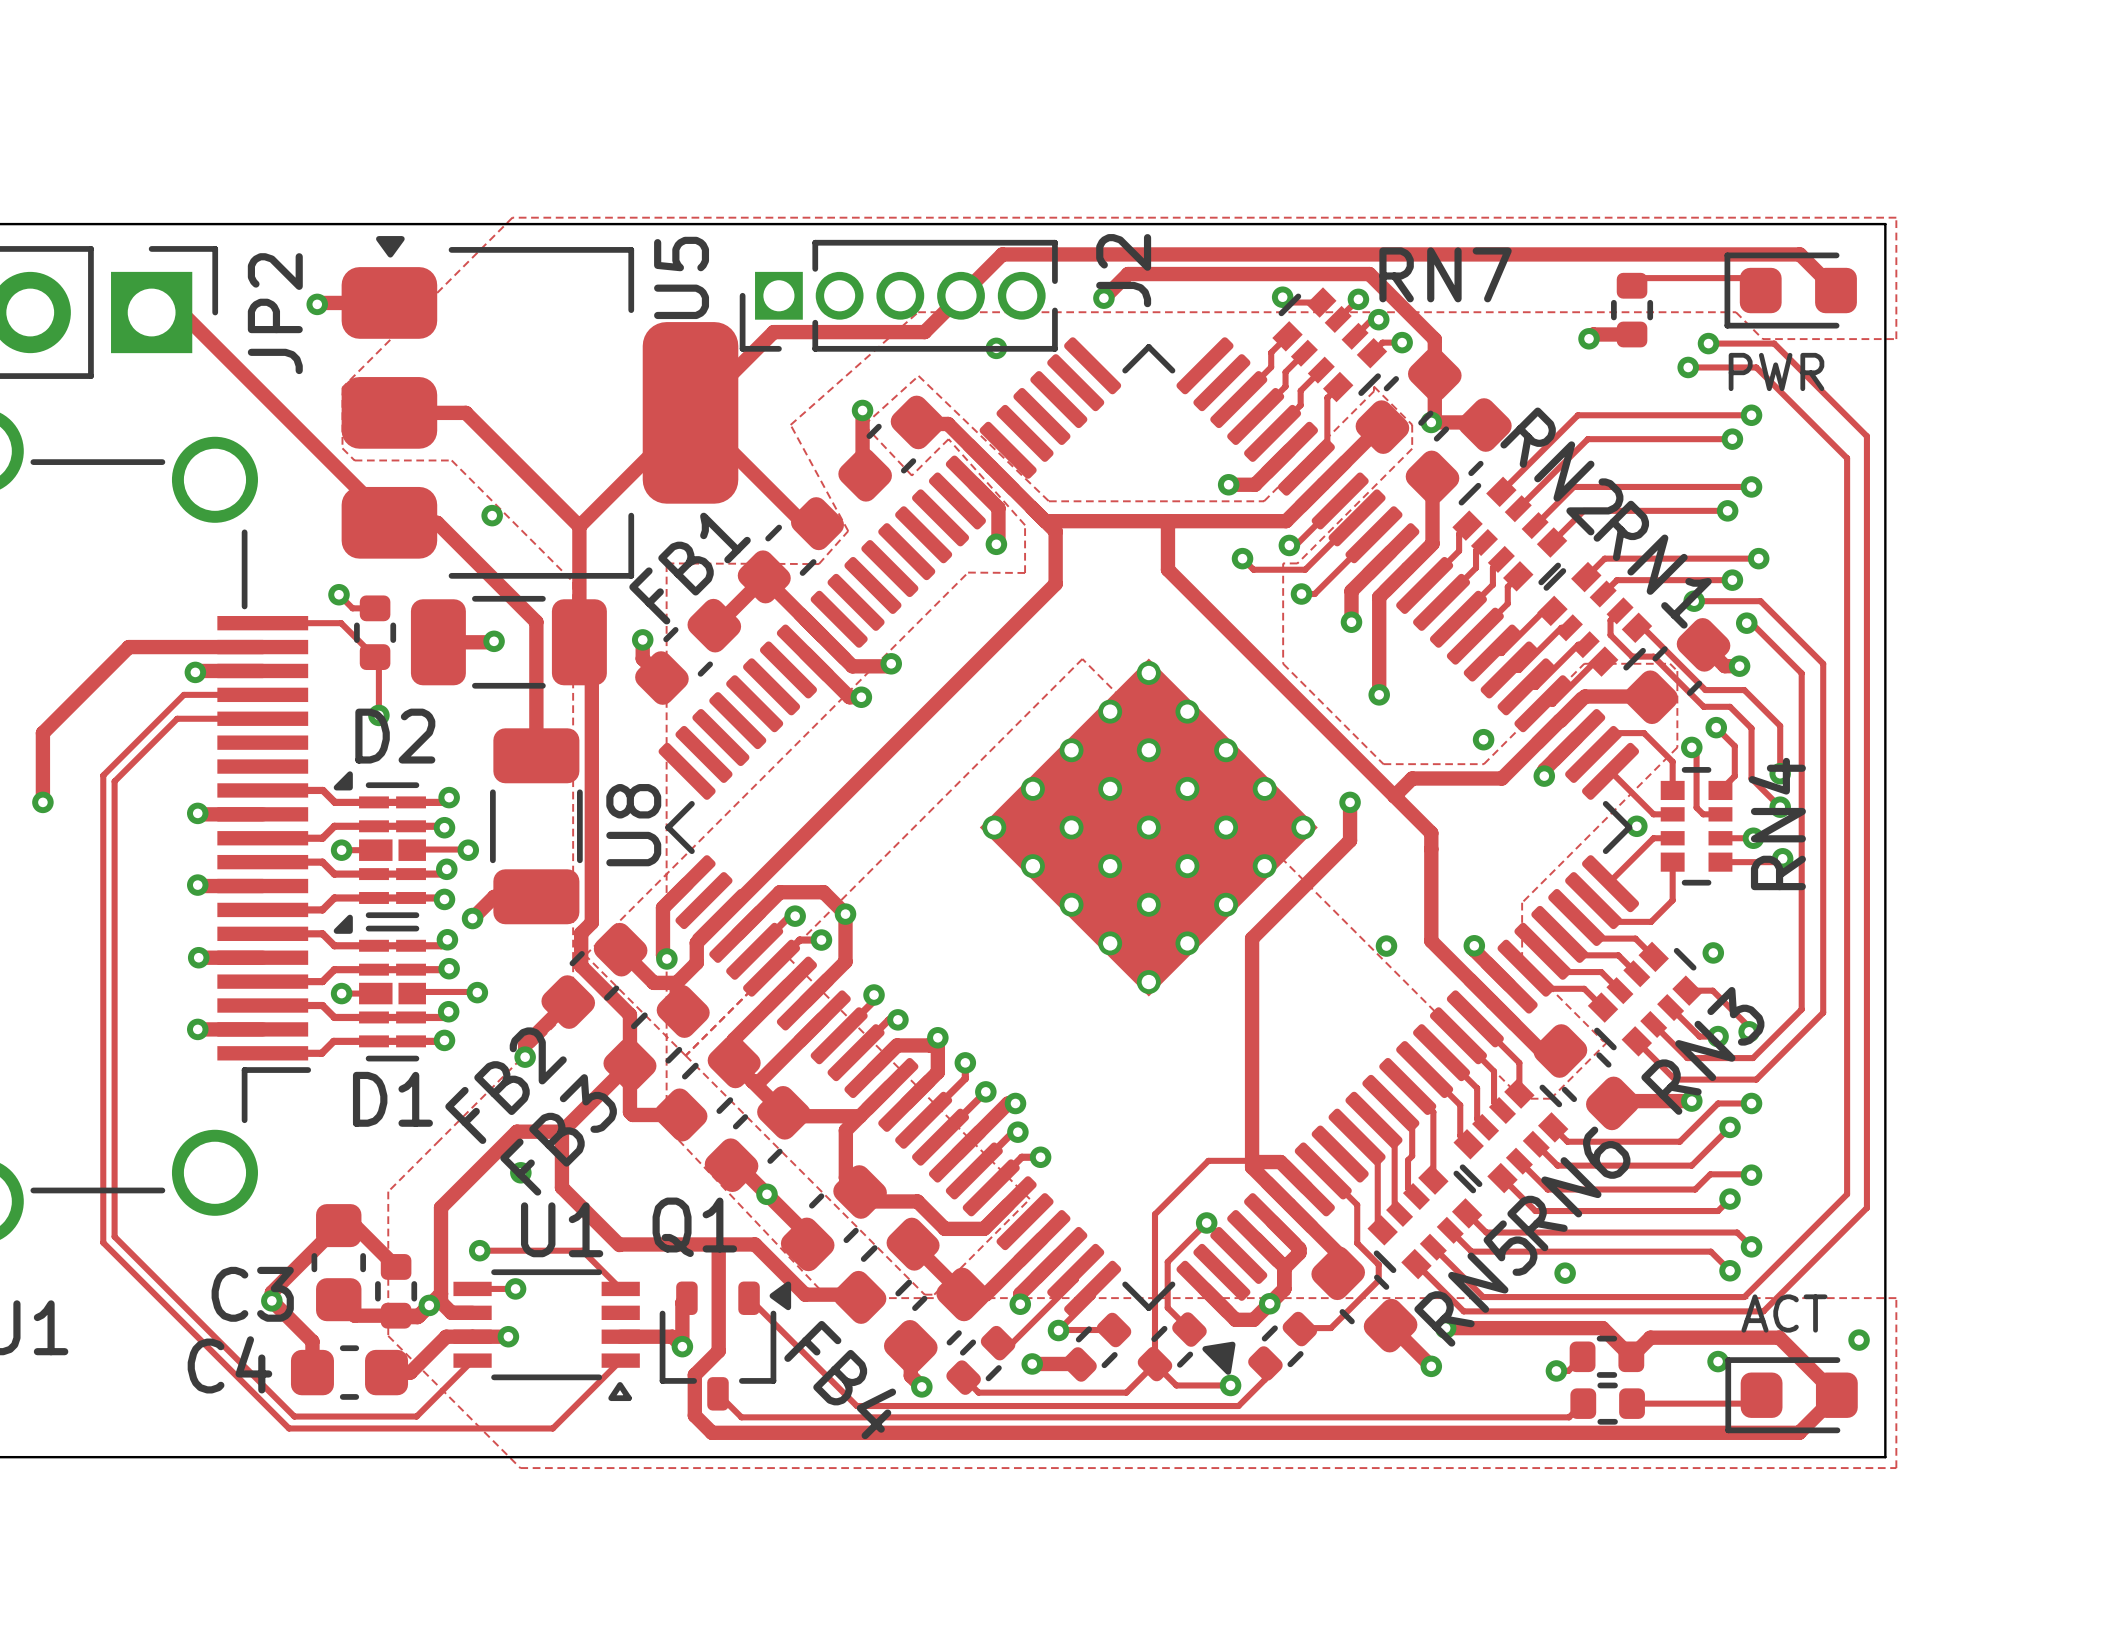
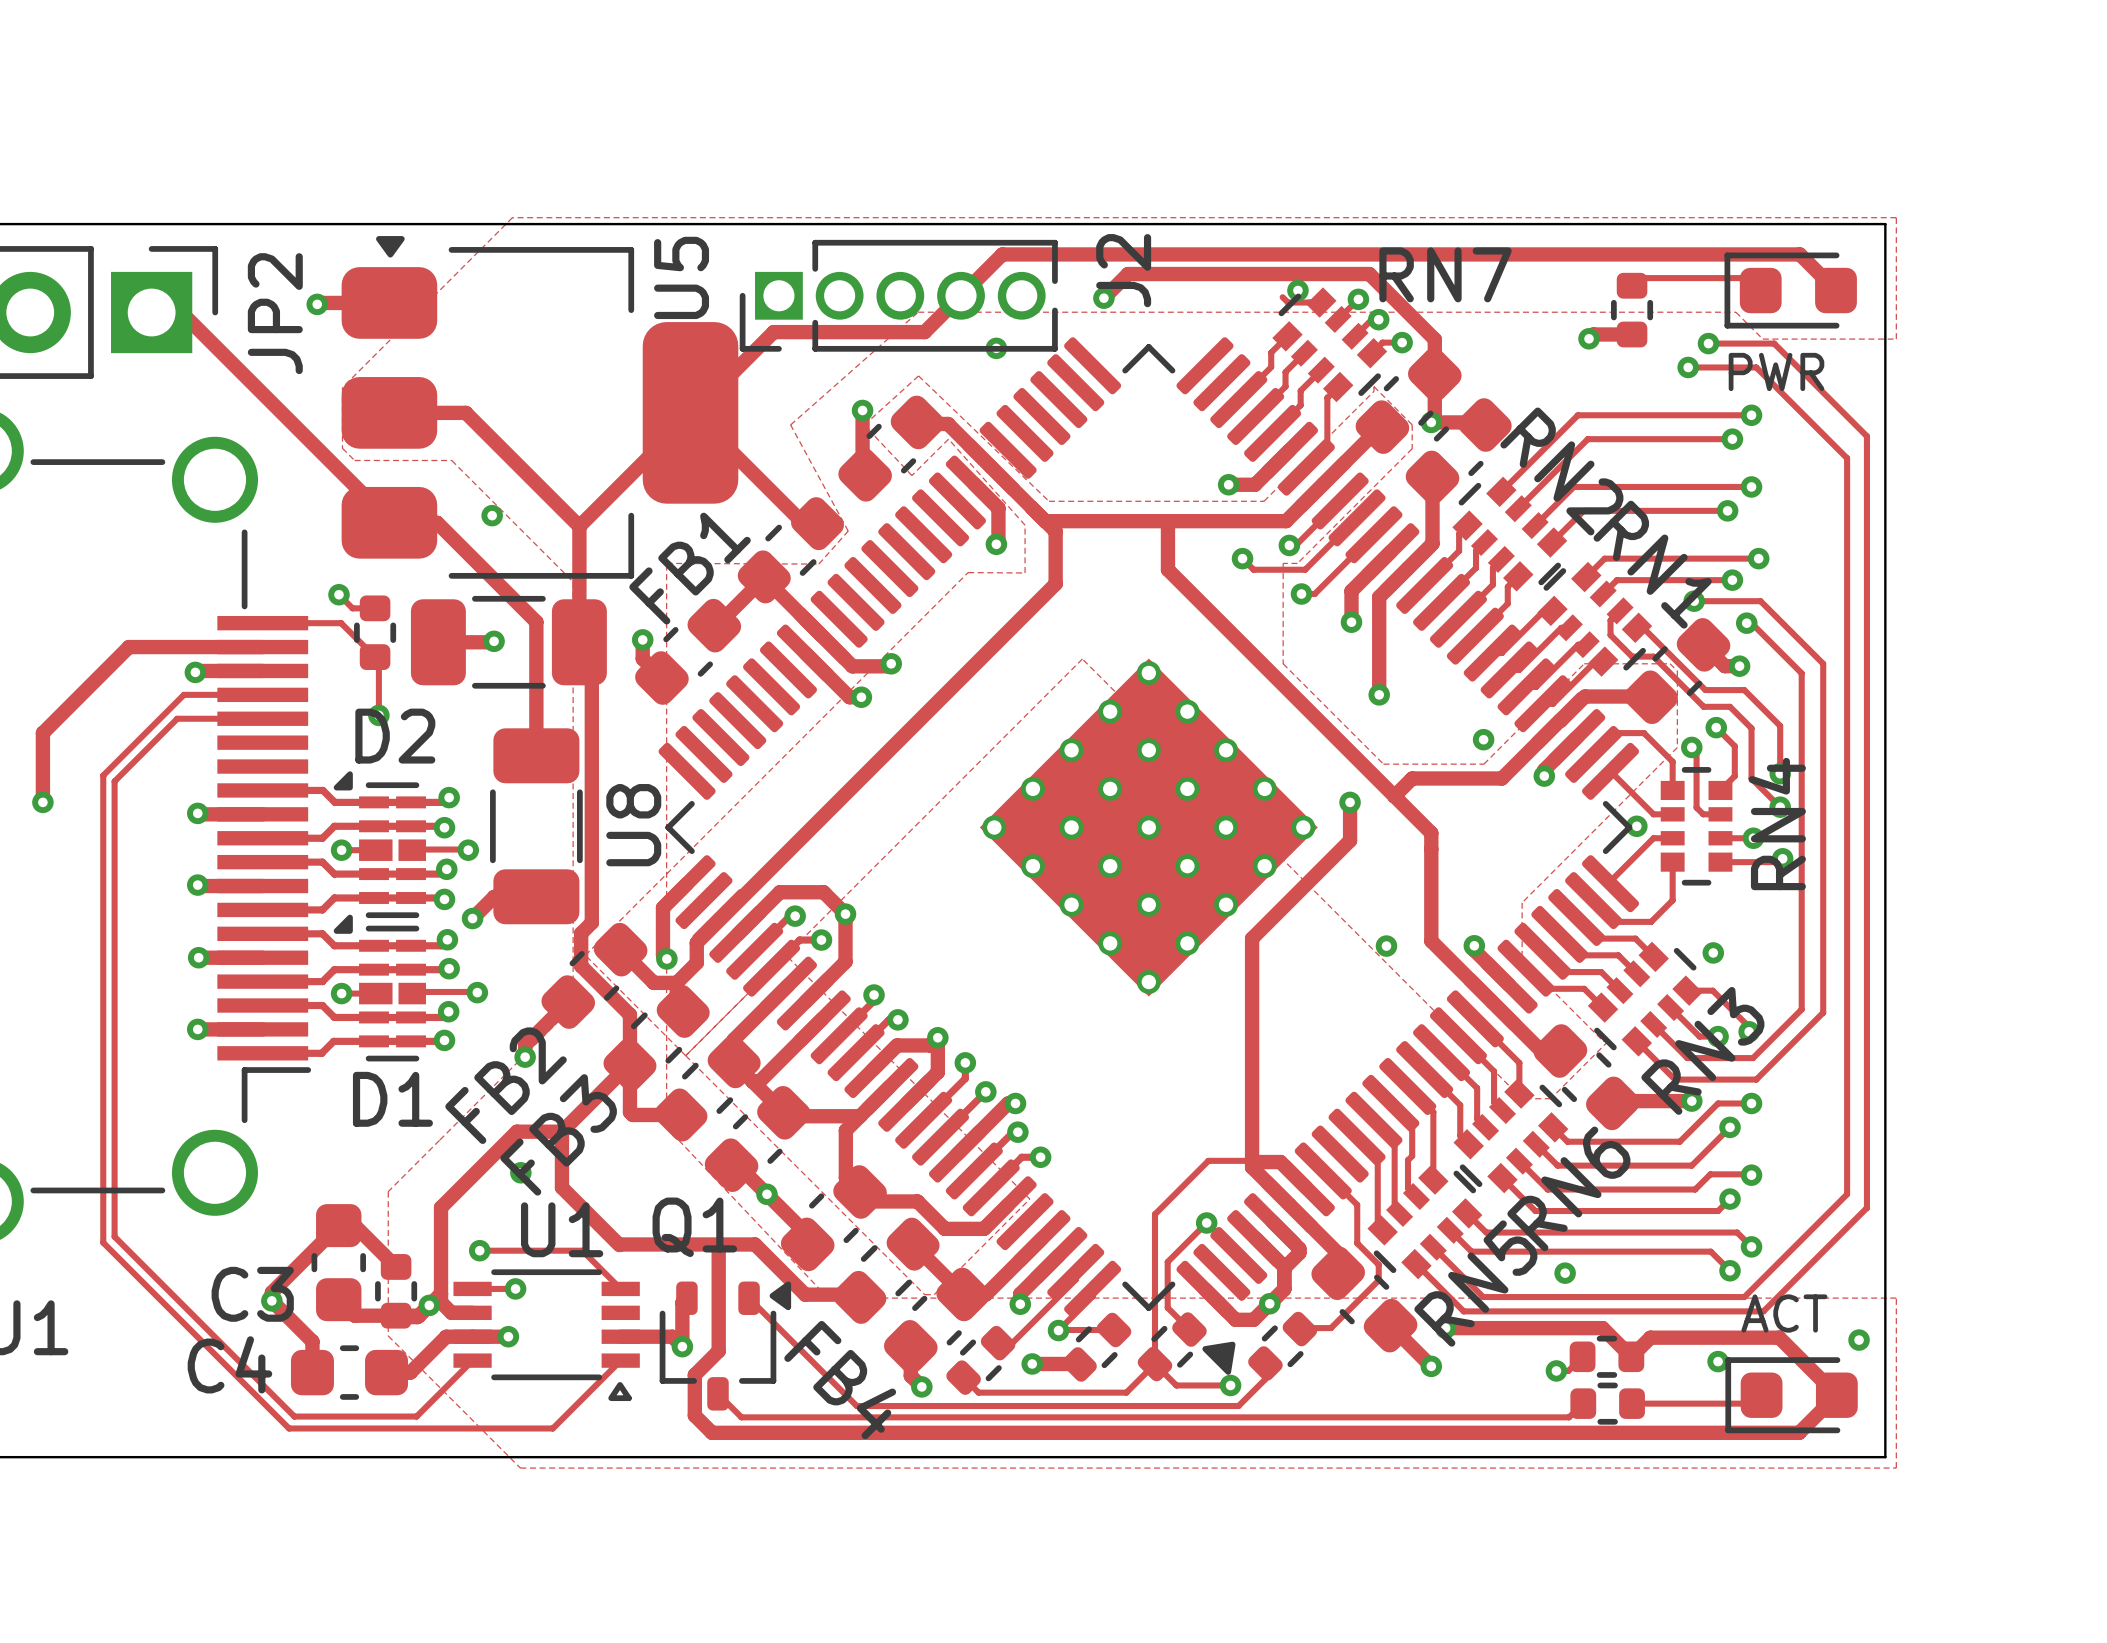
via position: (1282, 297) -> (1297, 290)

